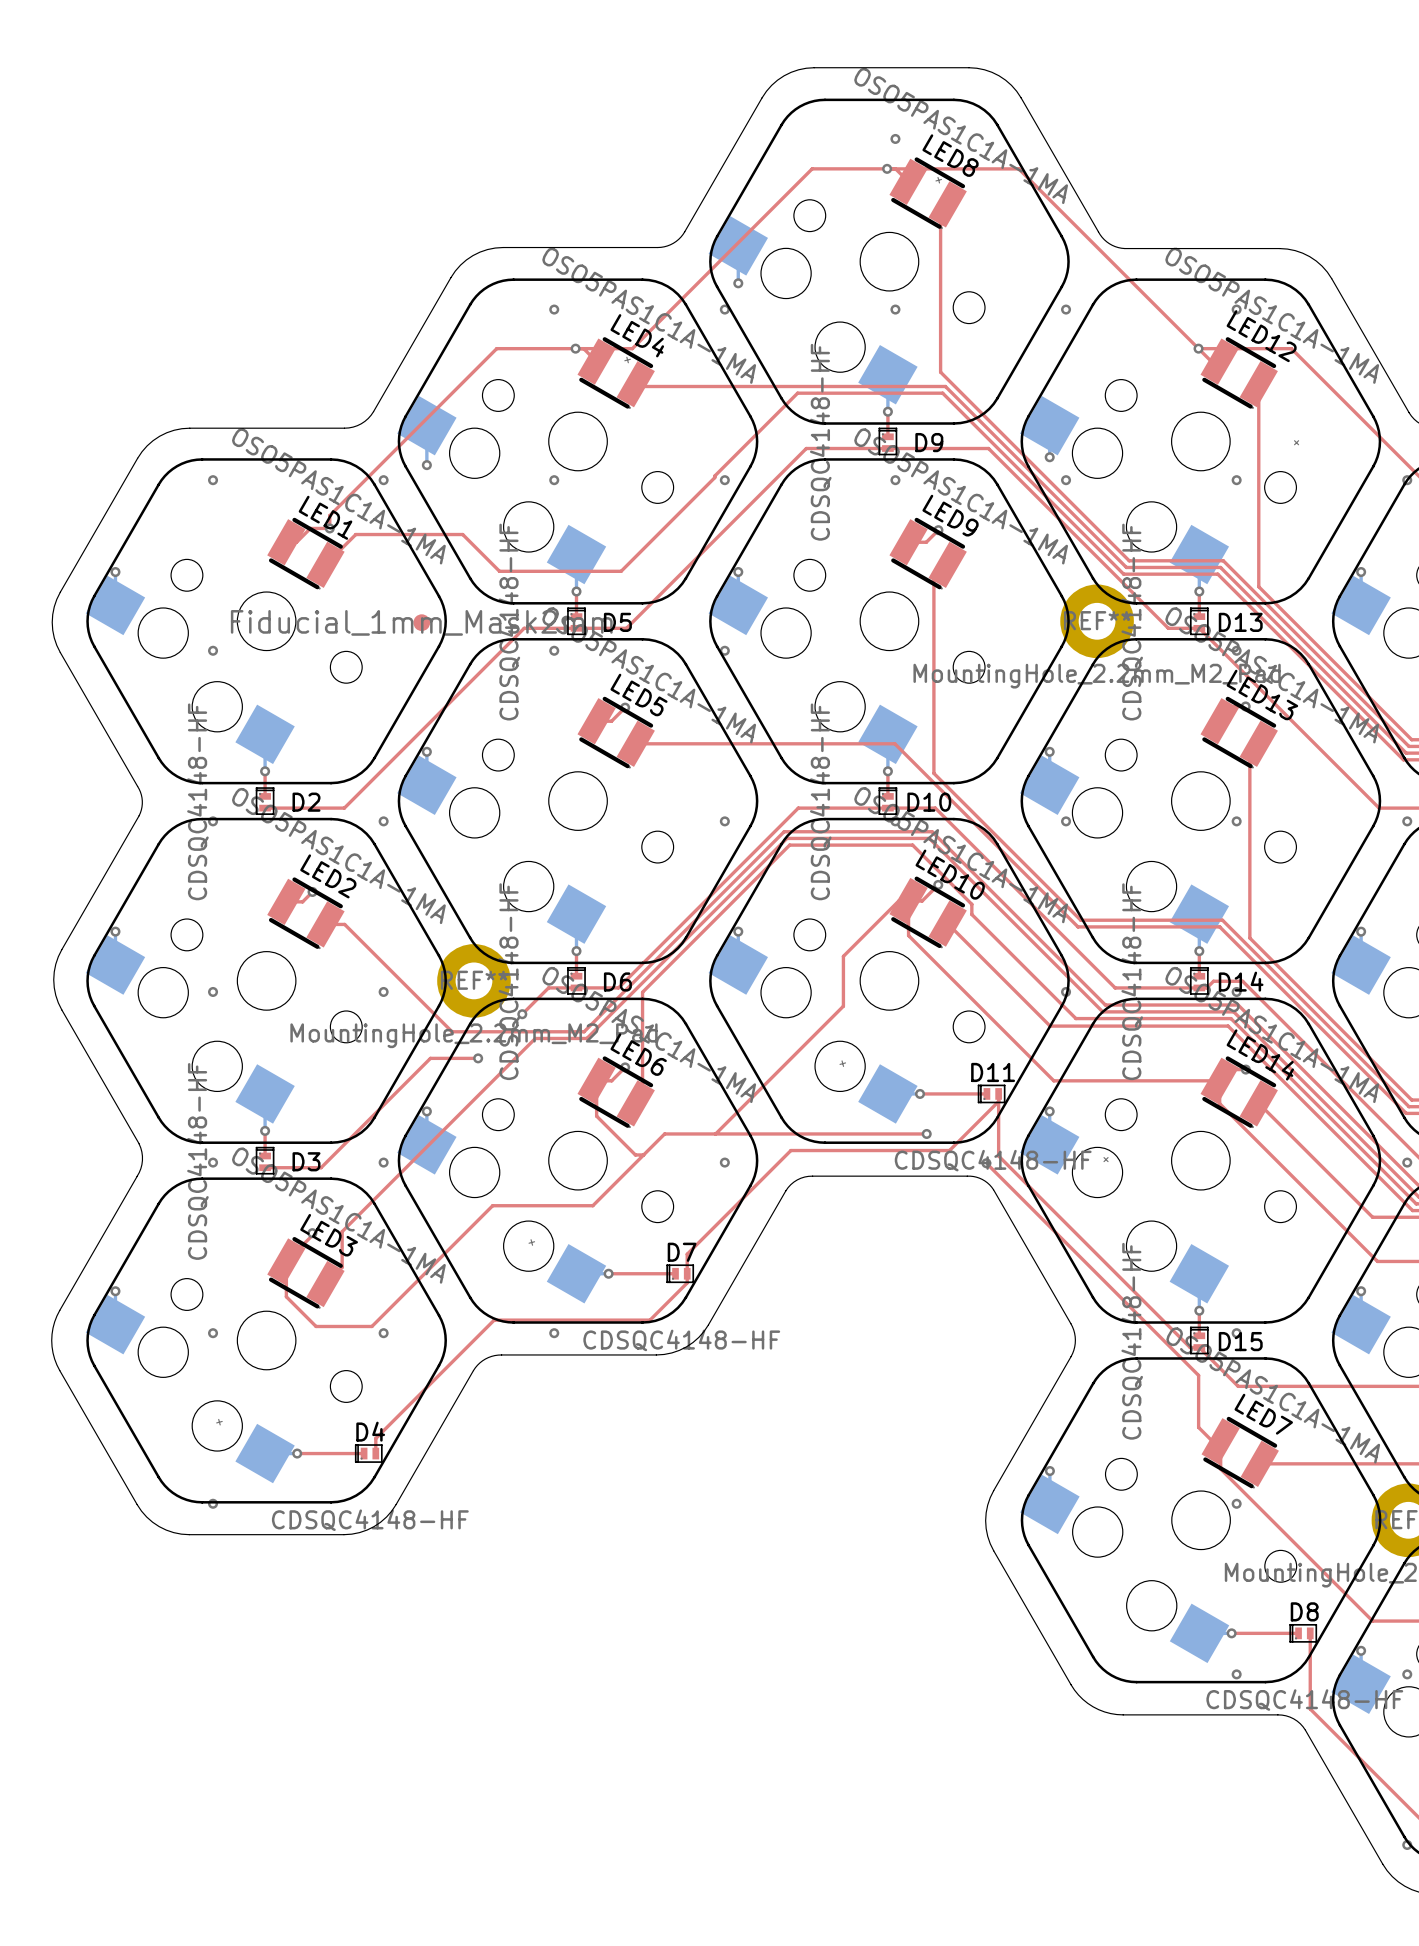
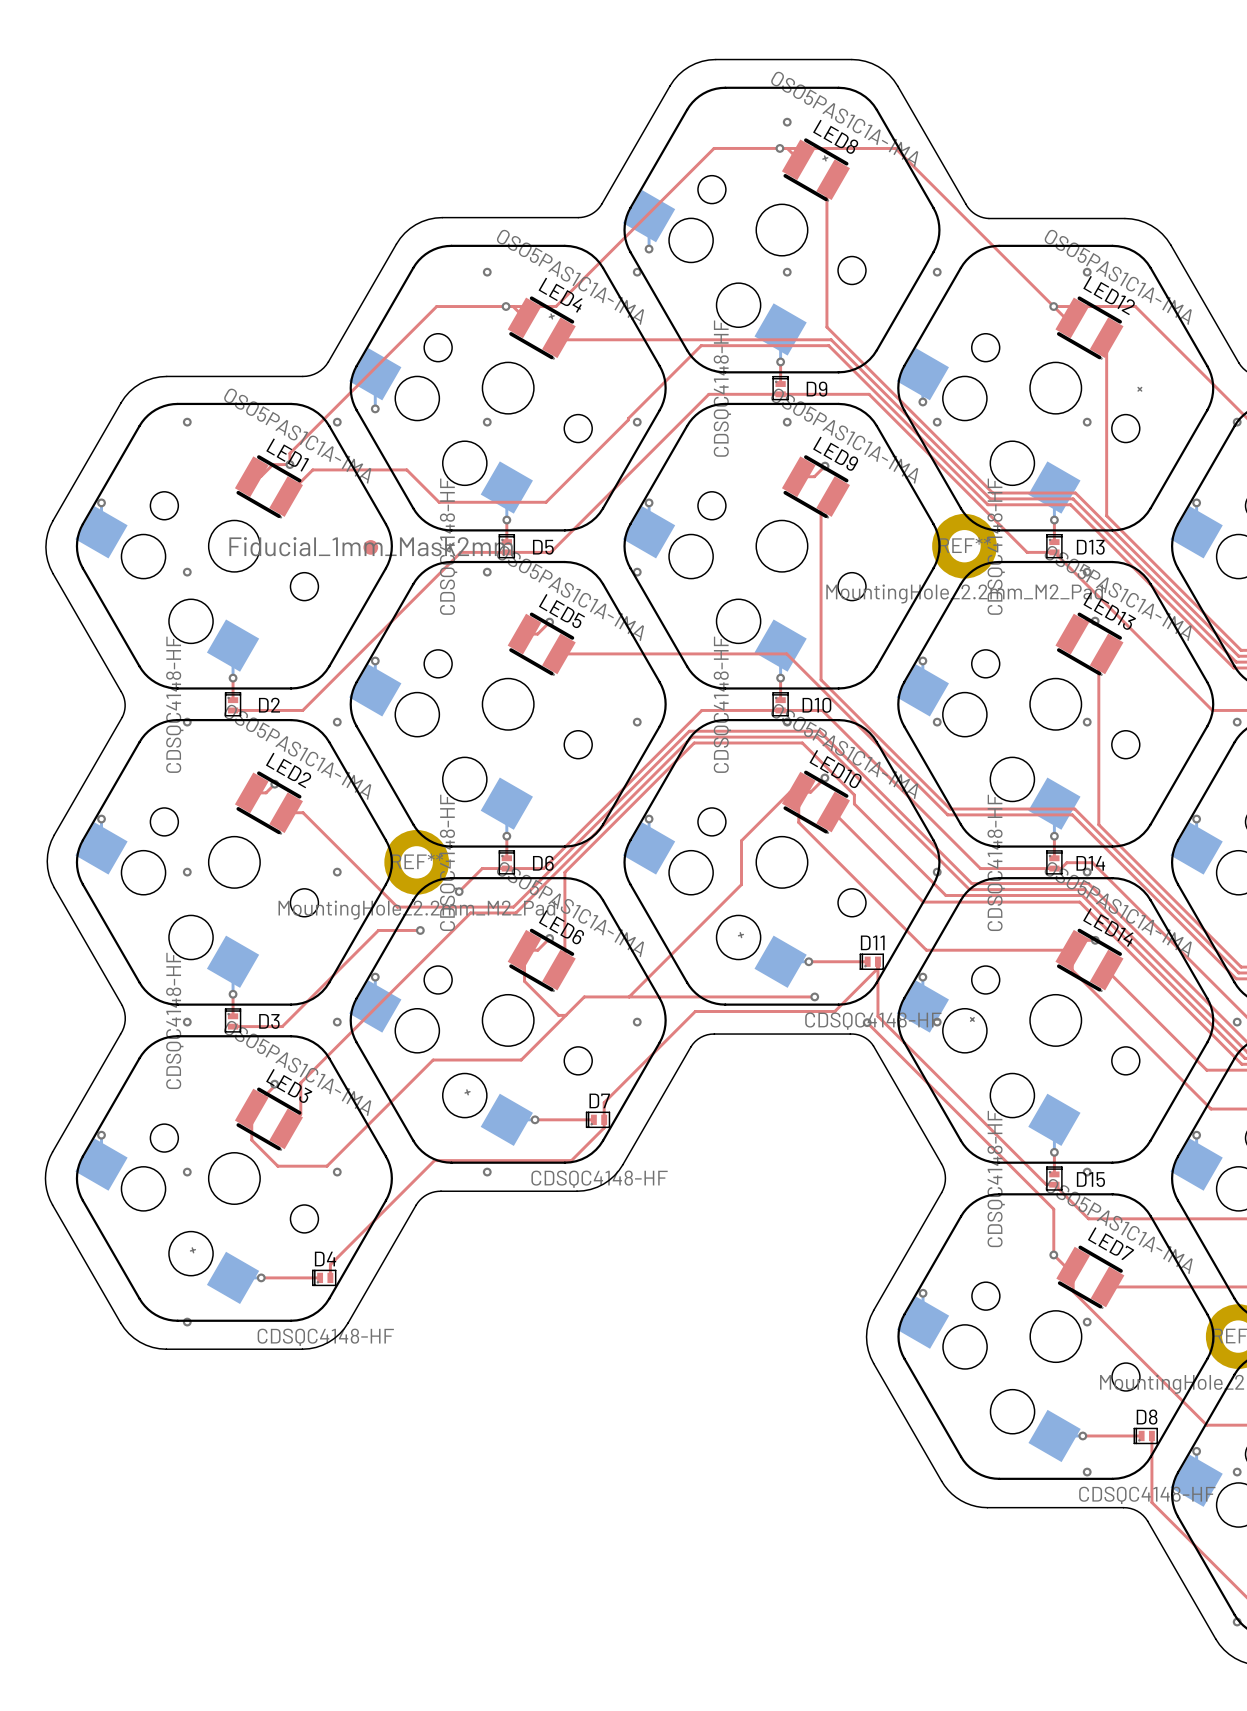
via: none -> (937, 1022)
via: none -> (1053, 1254)

